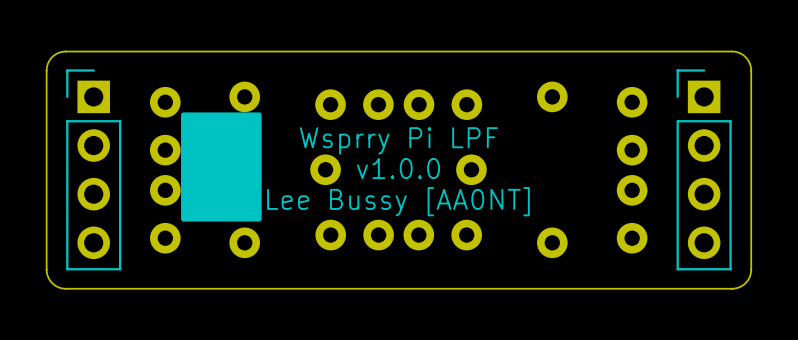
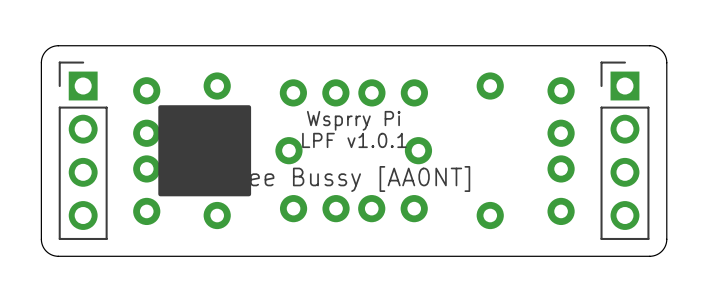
drawing shape: [181, 112, 262, 222] -> [158, 105, 252, 197]
text: Wsprry Pi LPF (398, 140) -> Wsprry Pi (353, 120)
text: v1.0.0 (398, 168) -> LPF v1.0.1 (354, 140)

